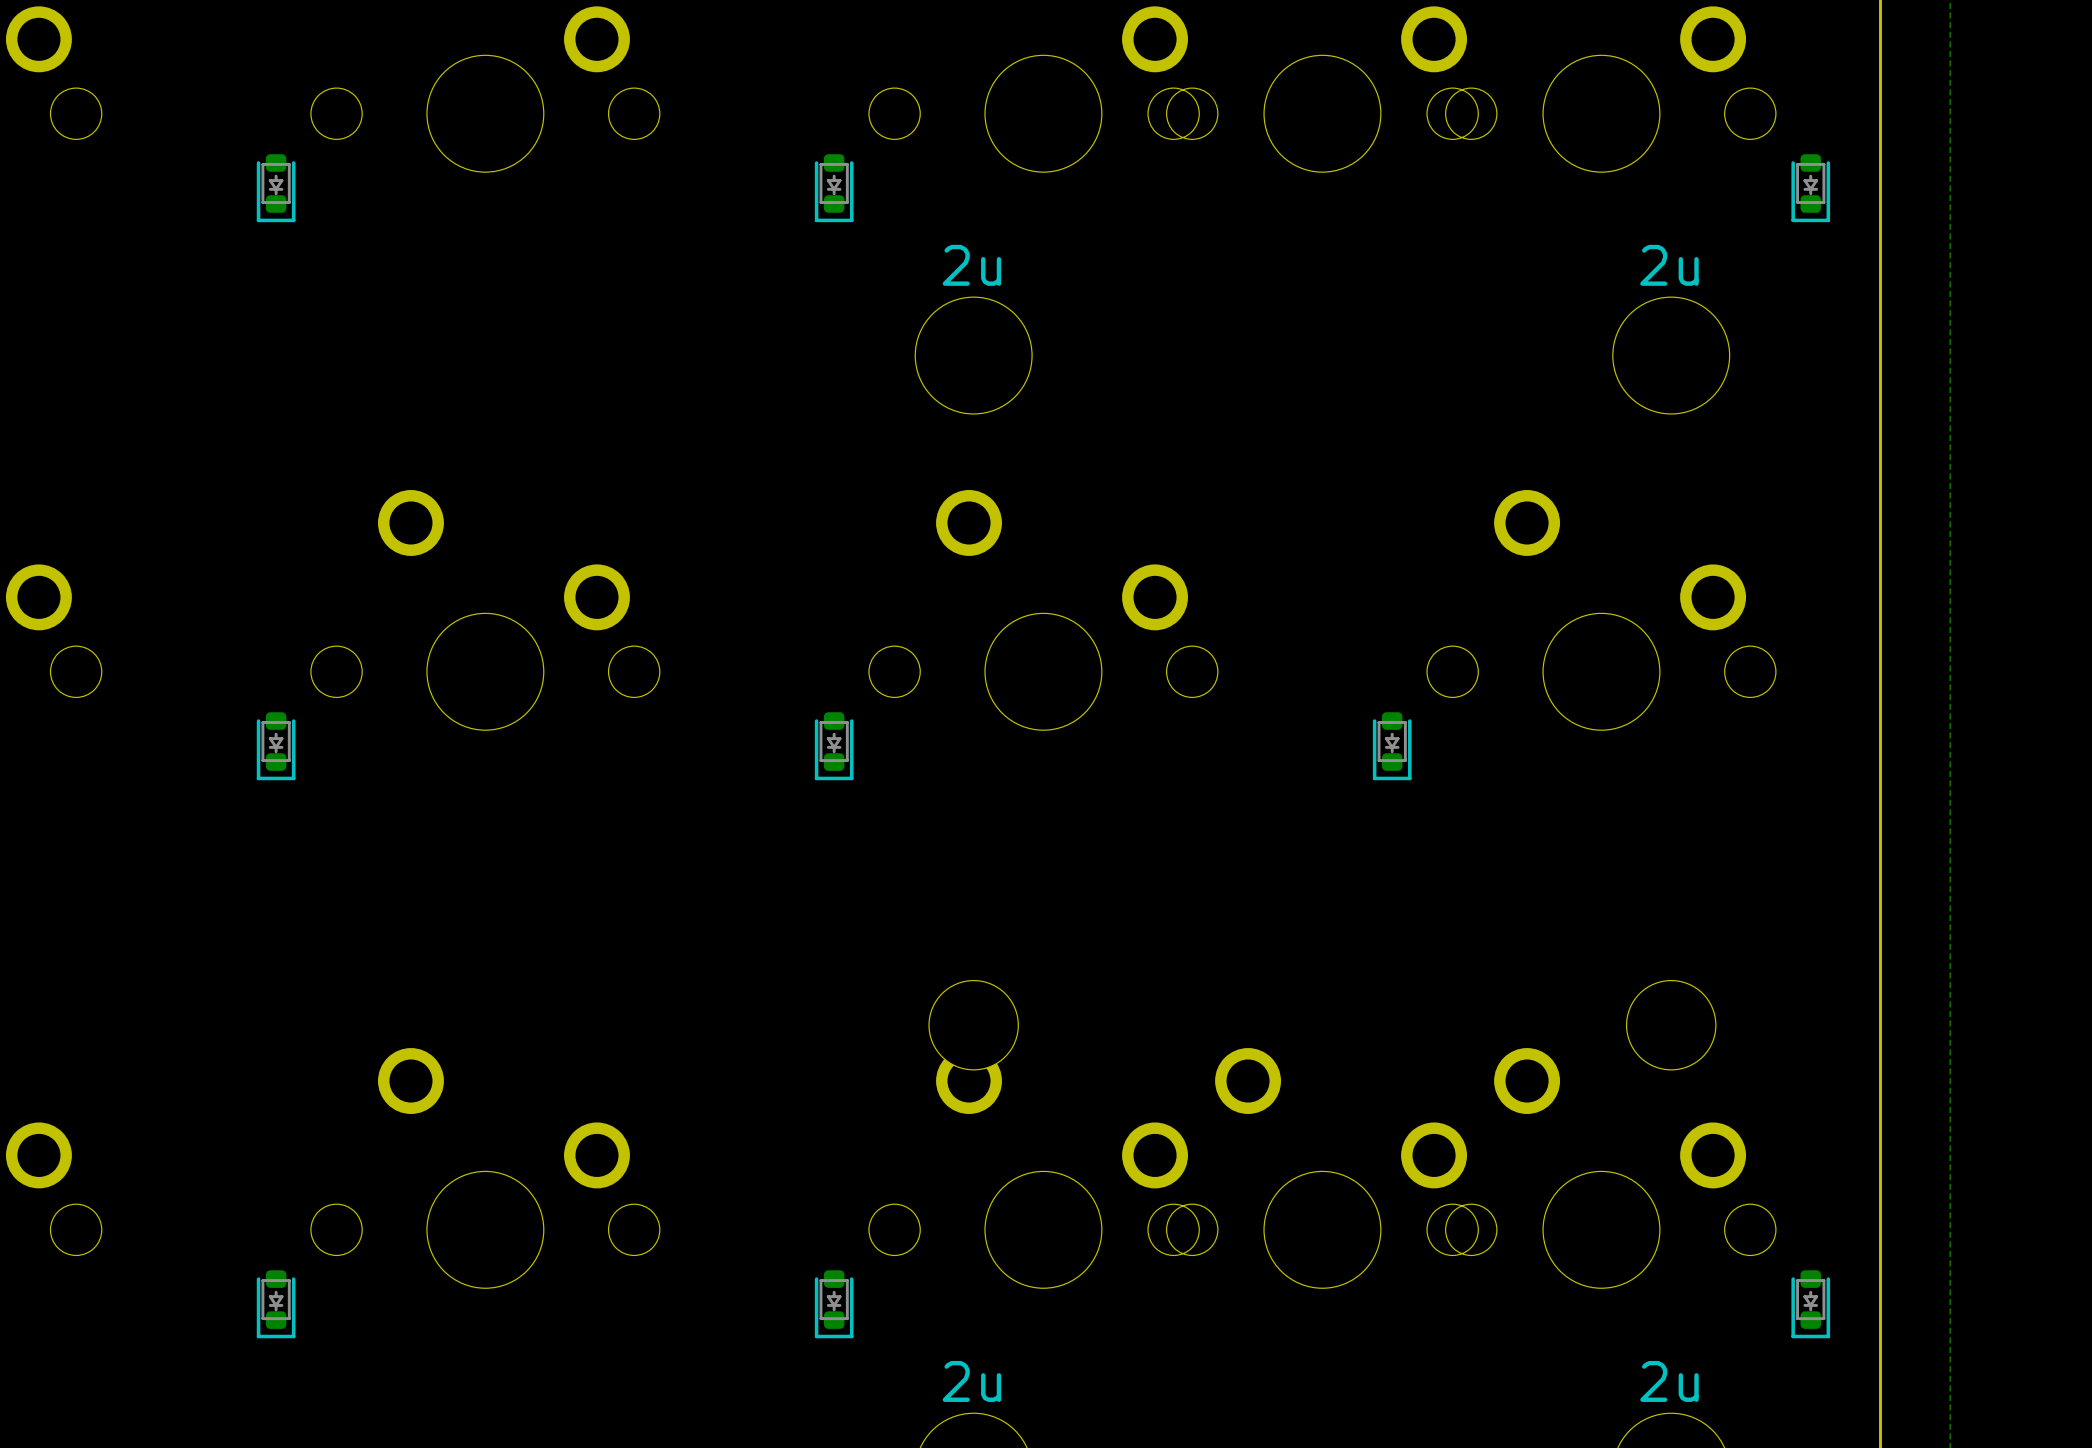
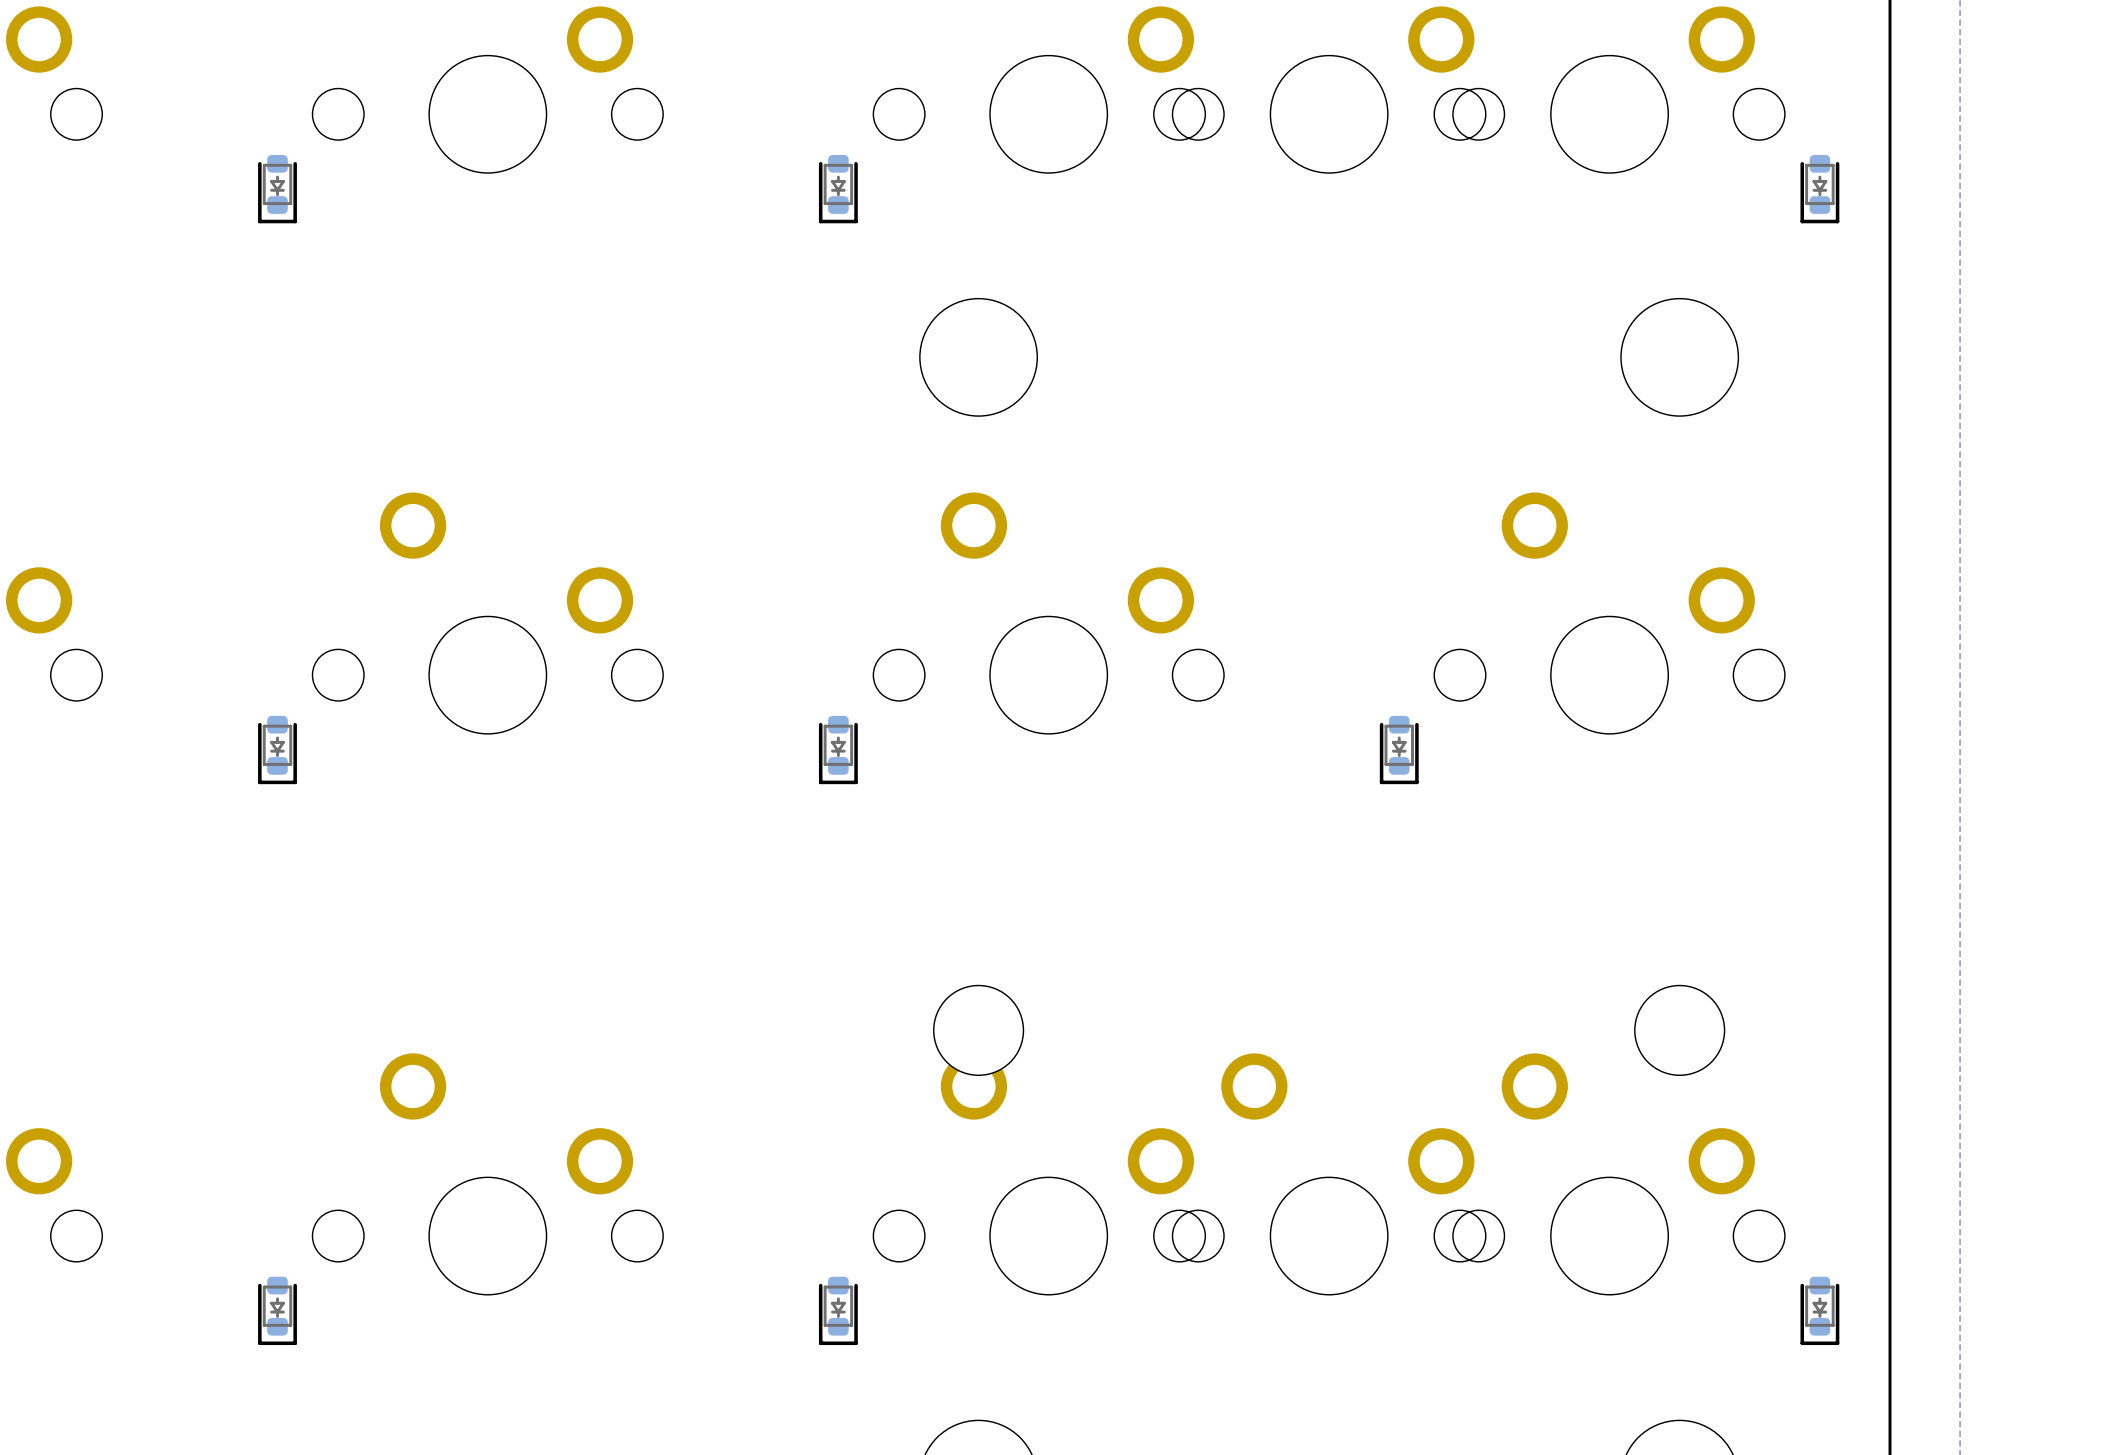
text: 2u (971, 265) -> none
text: 2u (1669, 265) -> none
text: 2u (971, 1381) -> none
text: 2u (1669, 1381) -> none

